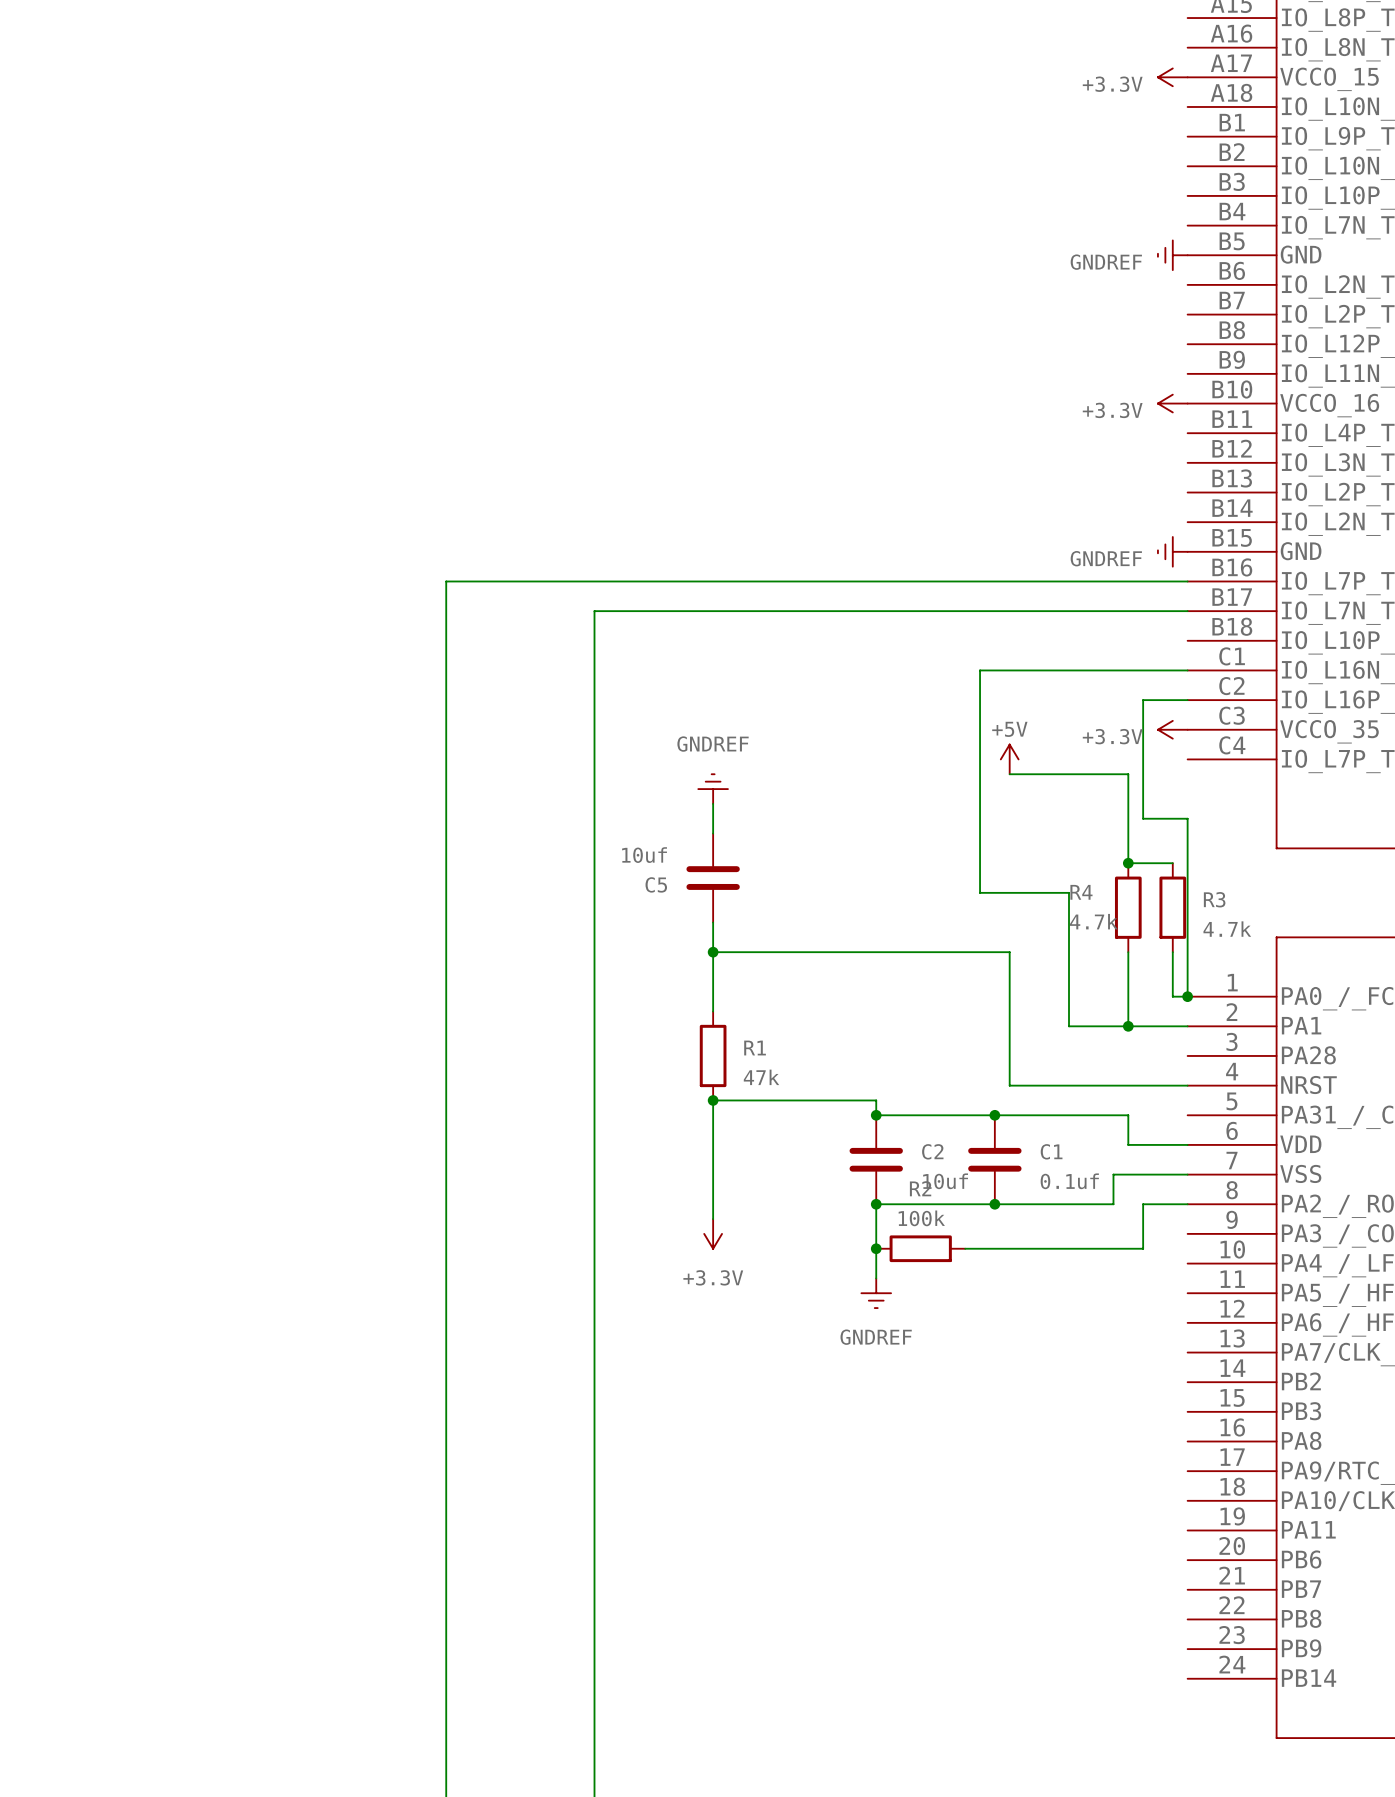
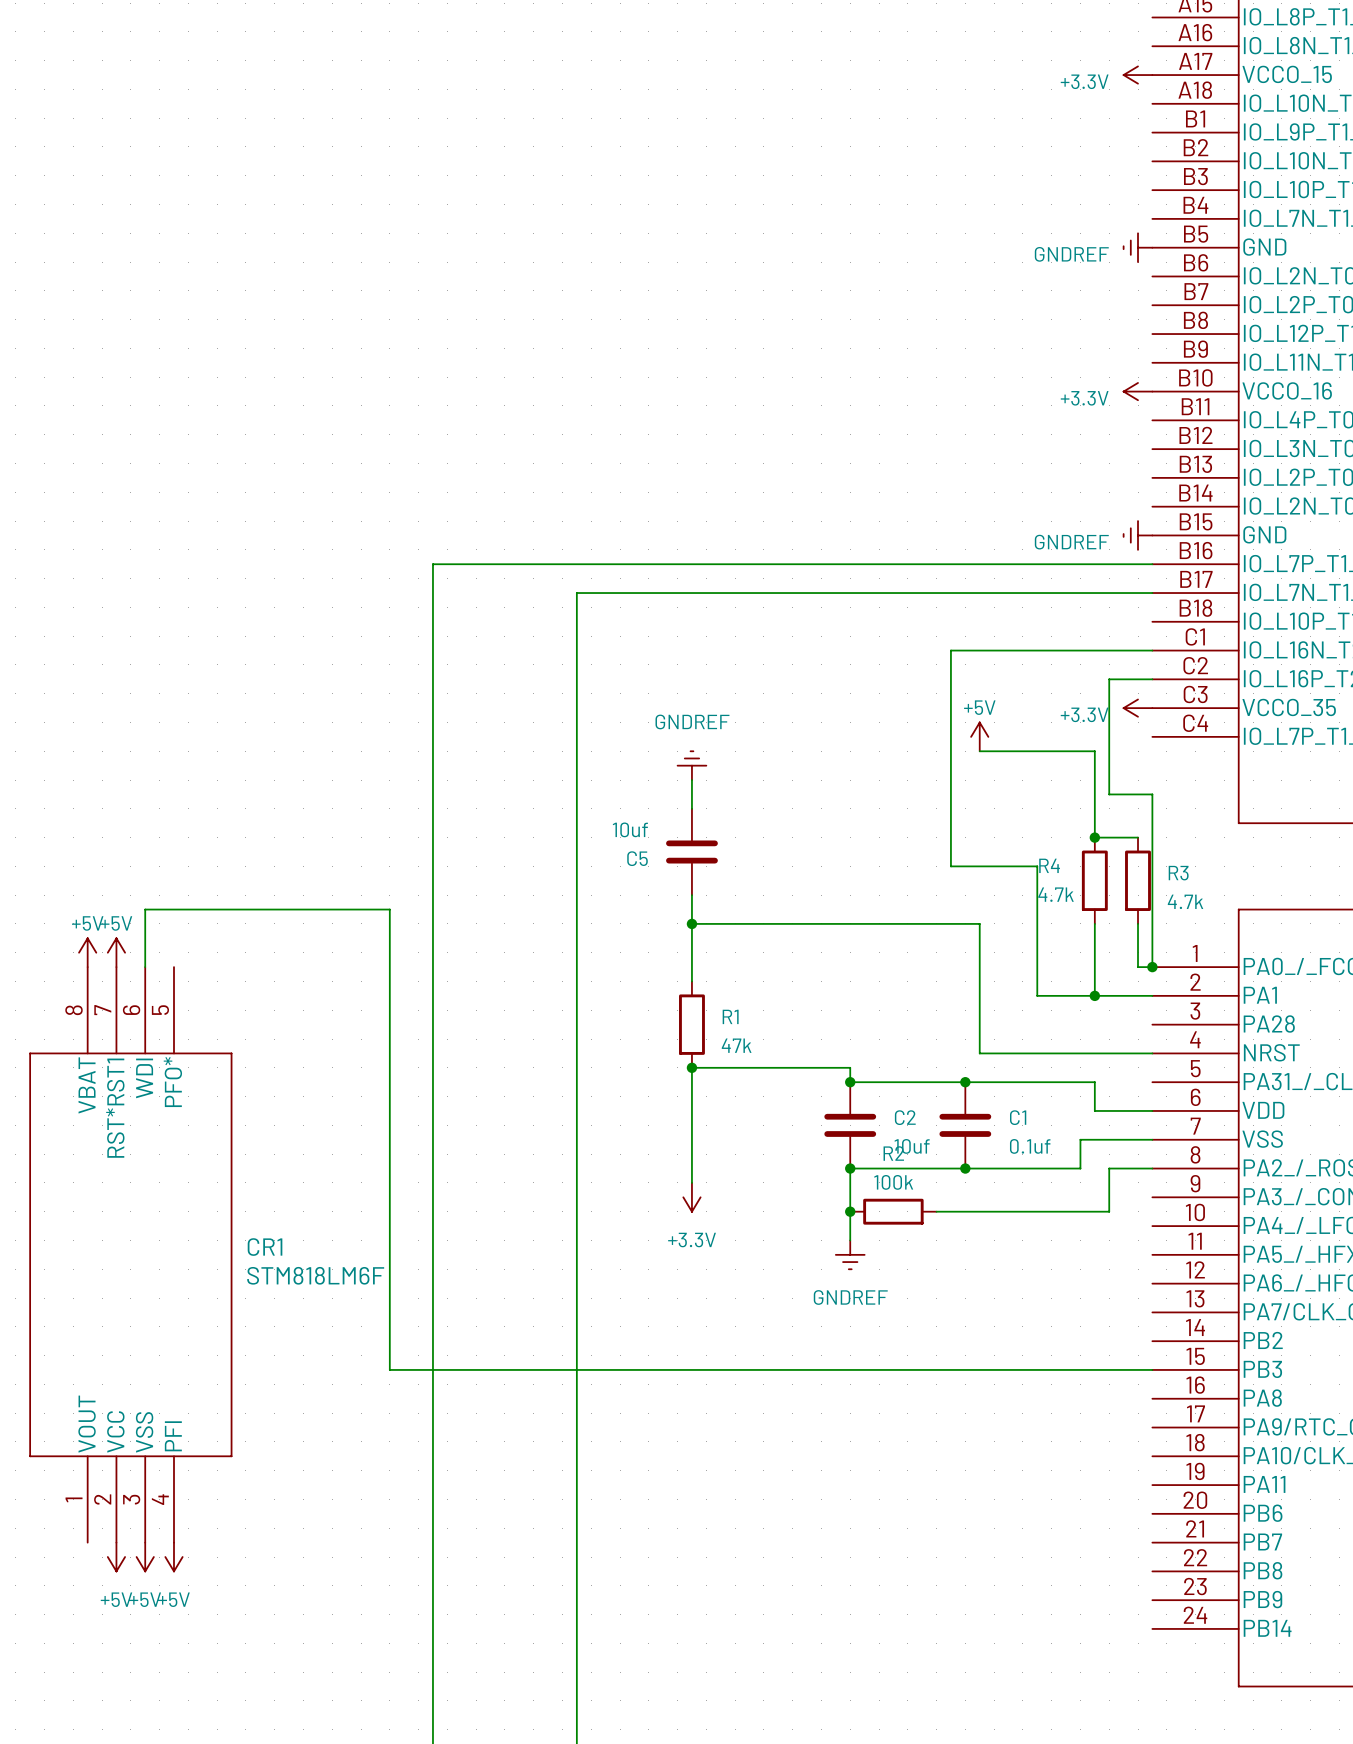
power symbol: none -> +5V (87, 952)
power symbol: none -> +5V (116, 952)
wire: none -> (145, 967) (145, 909) (389, 909) (389, 1369) (1152, 1369)
CR1: none -> STM818LM6F (130, 1254)
power symbol: none -> +5V (116, 1557)
power symbol: none -> +5V (145, 1557)
power symbol: none -> +5V (173, 1557)

